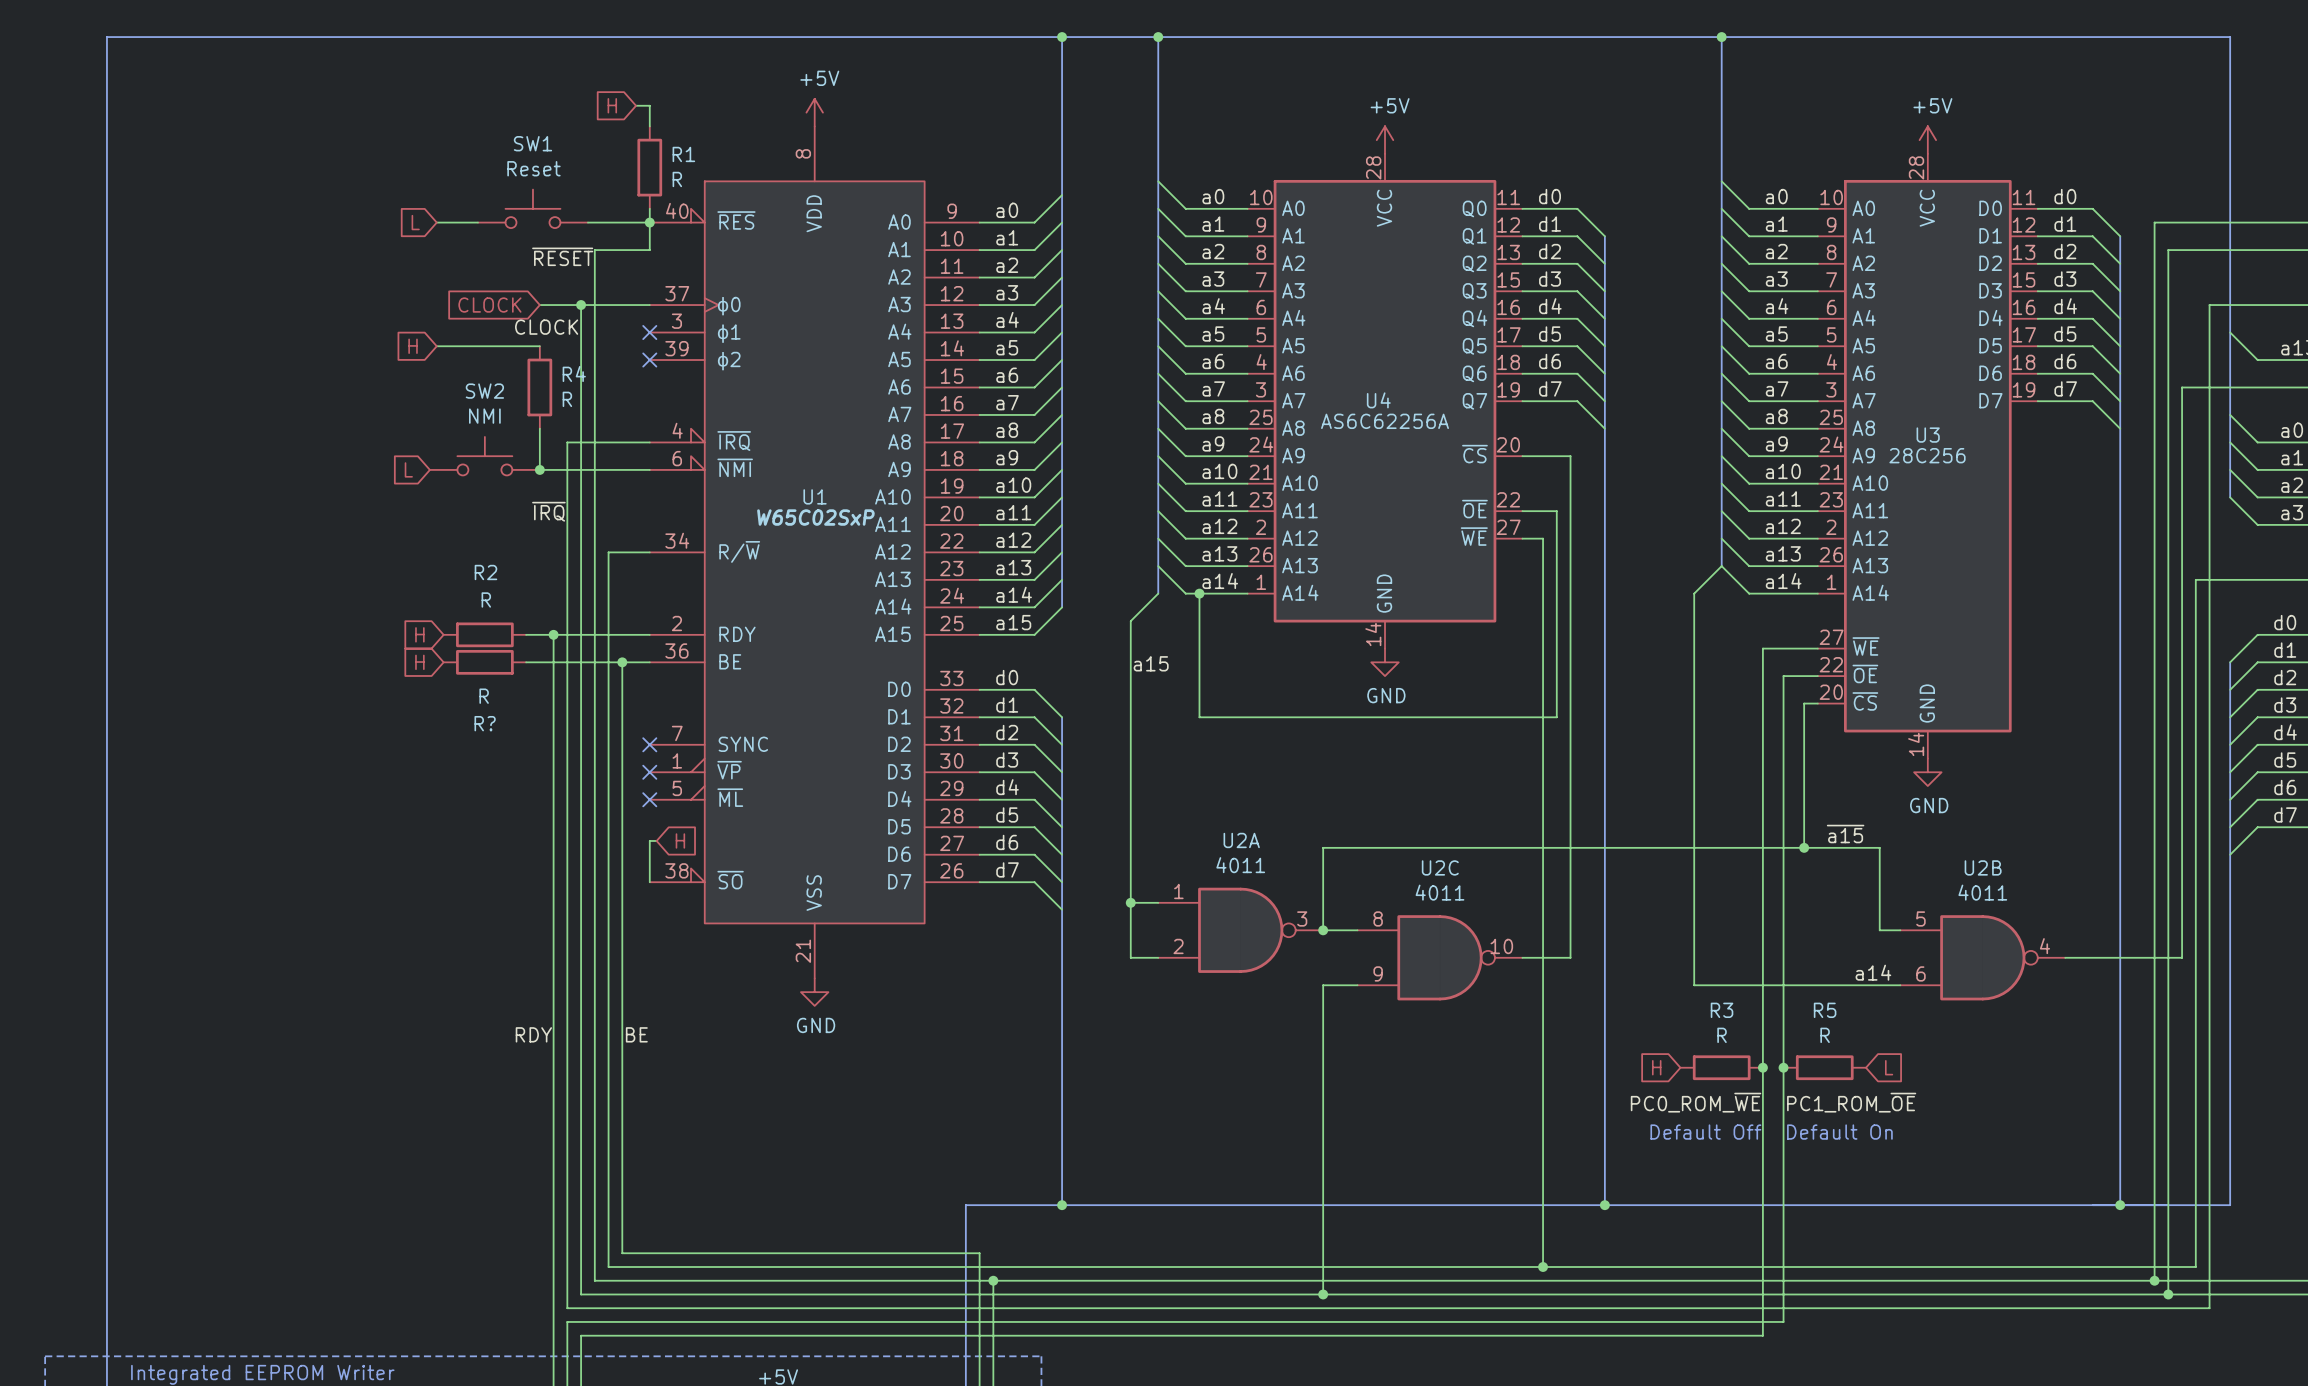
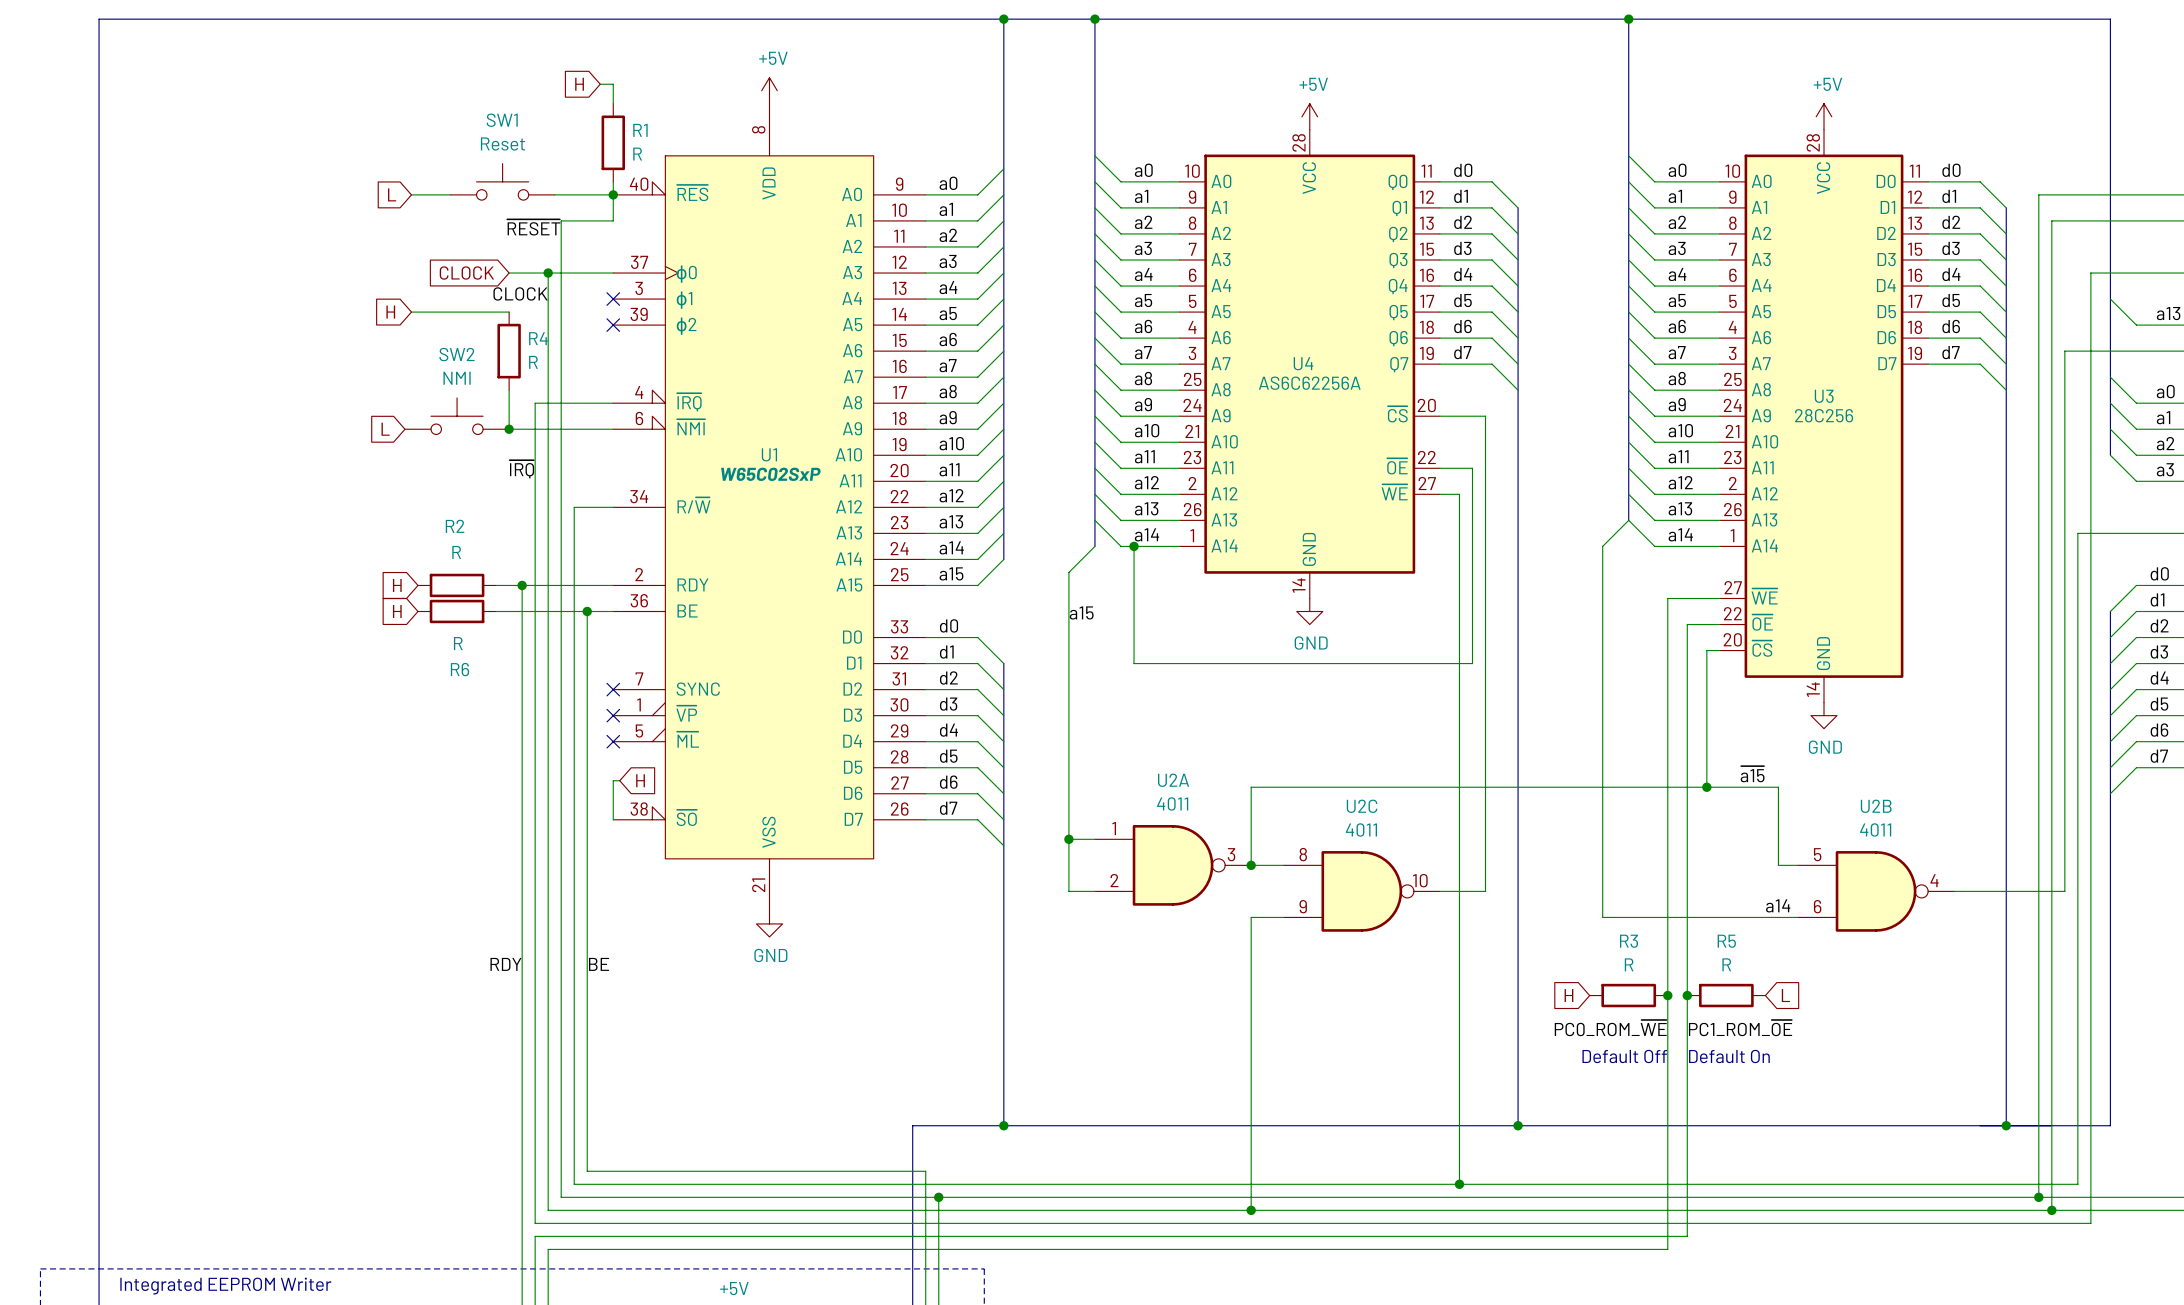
R? name: R? (485, 723) -> R6 (460, 669)

